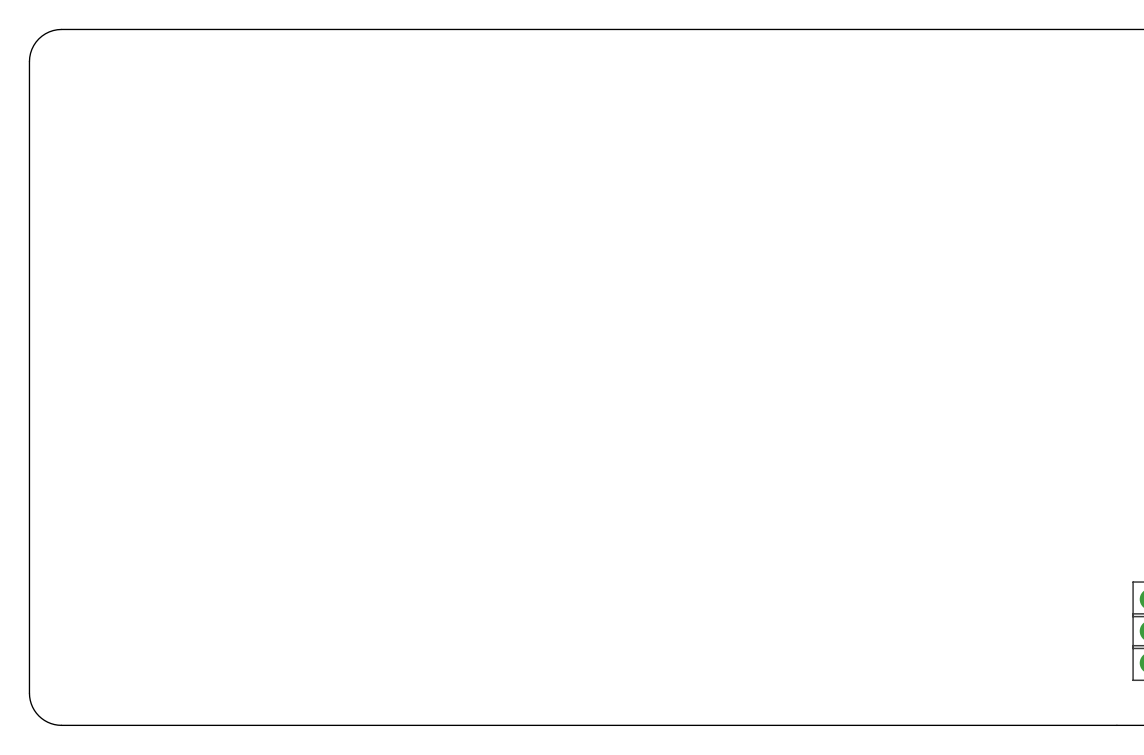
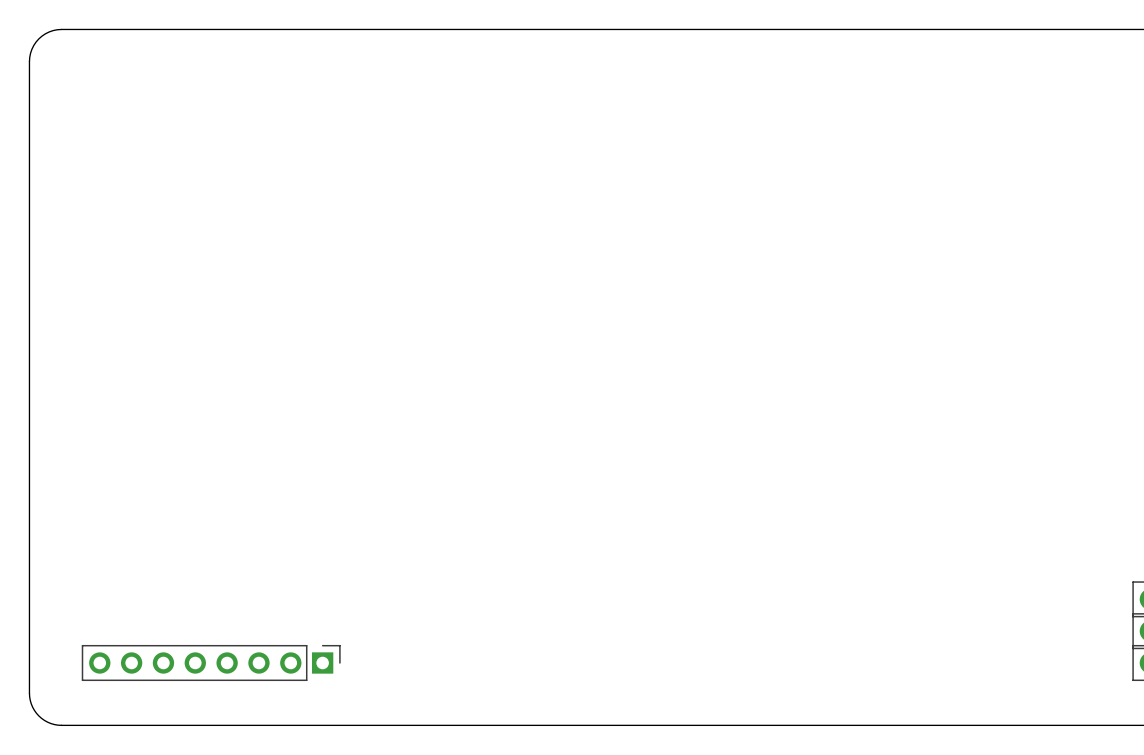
part: none -> (211, 662)

